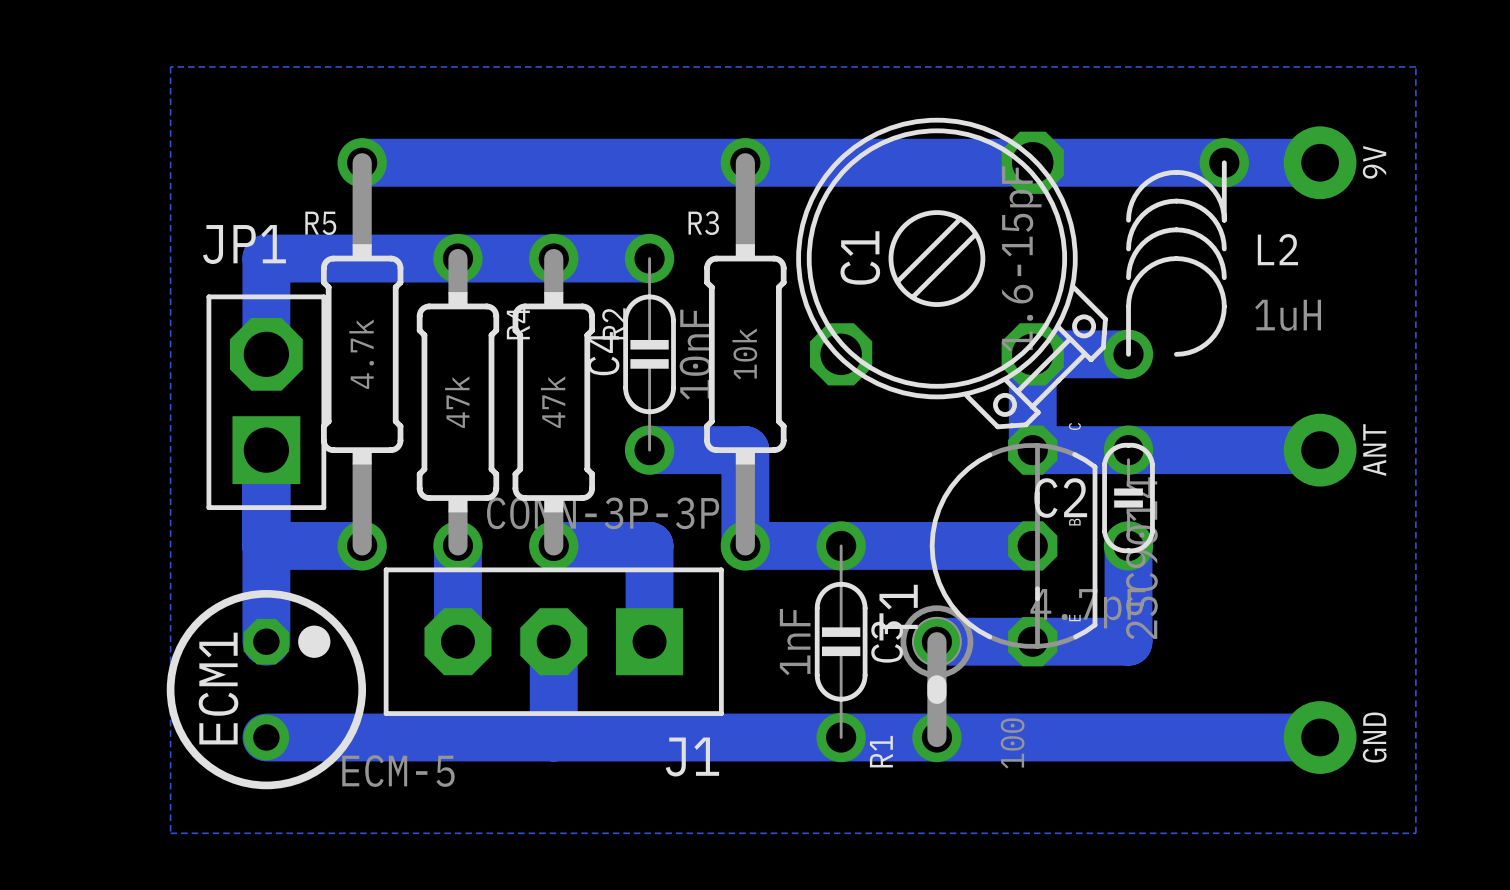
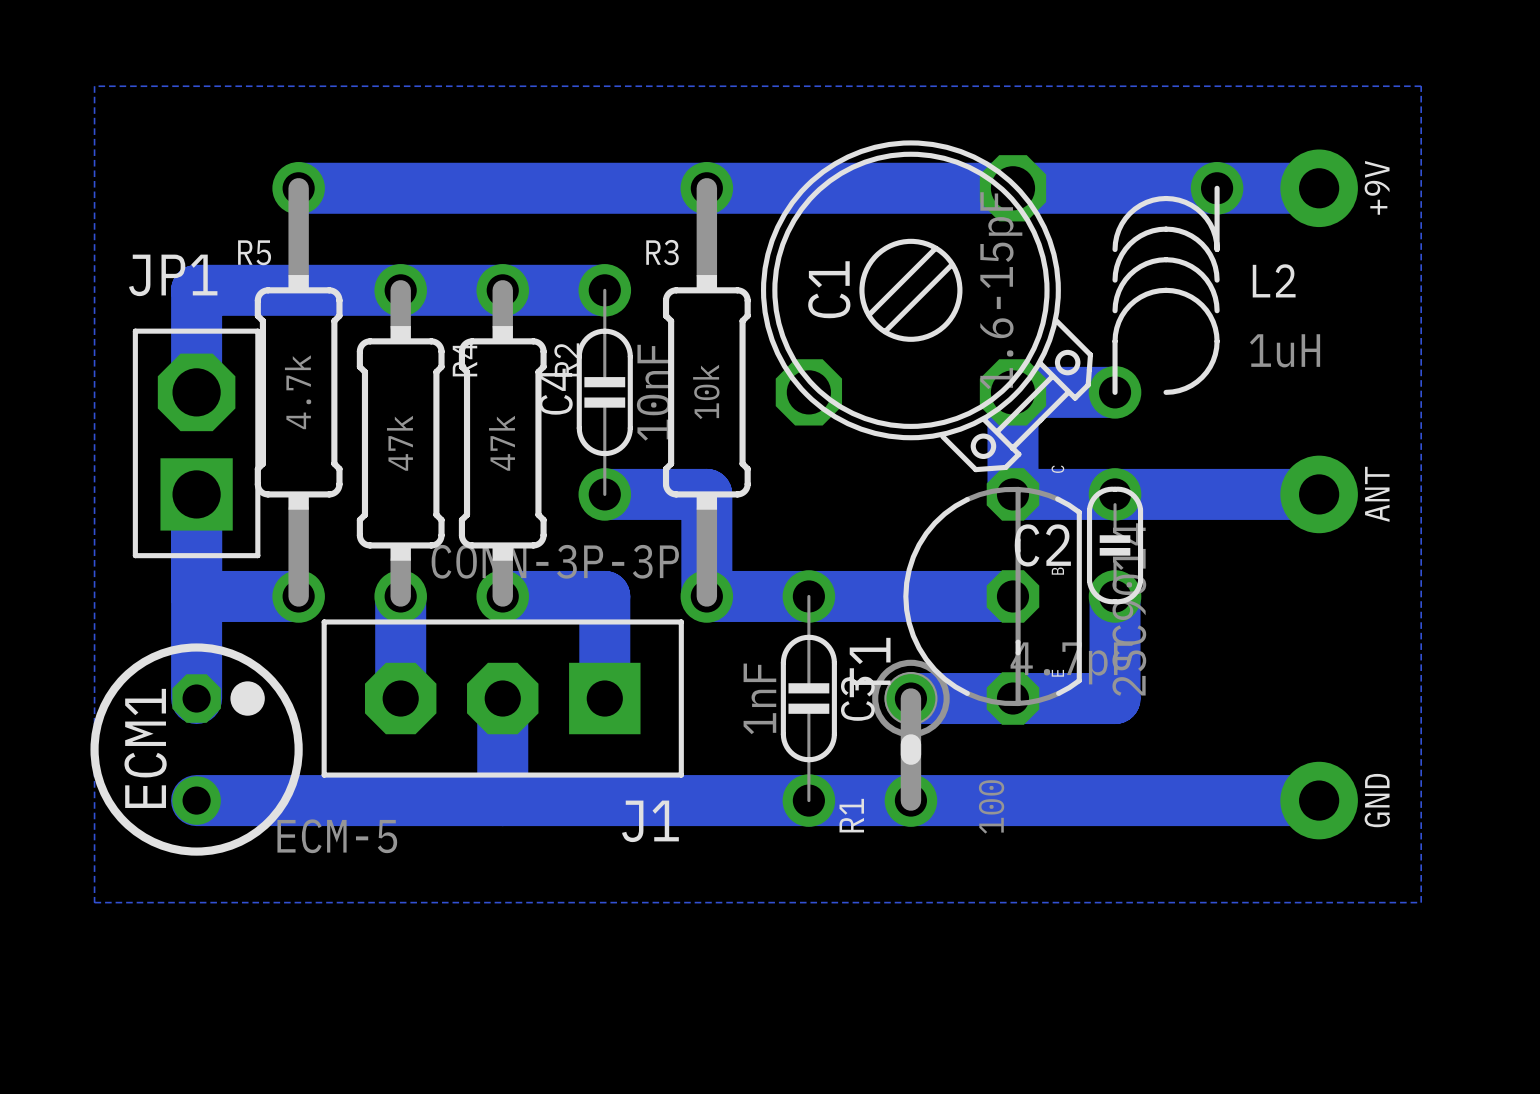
9V name: 9V (1374, 162) -> +9V (1377, 187)

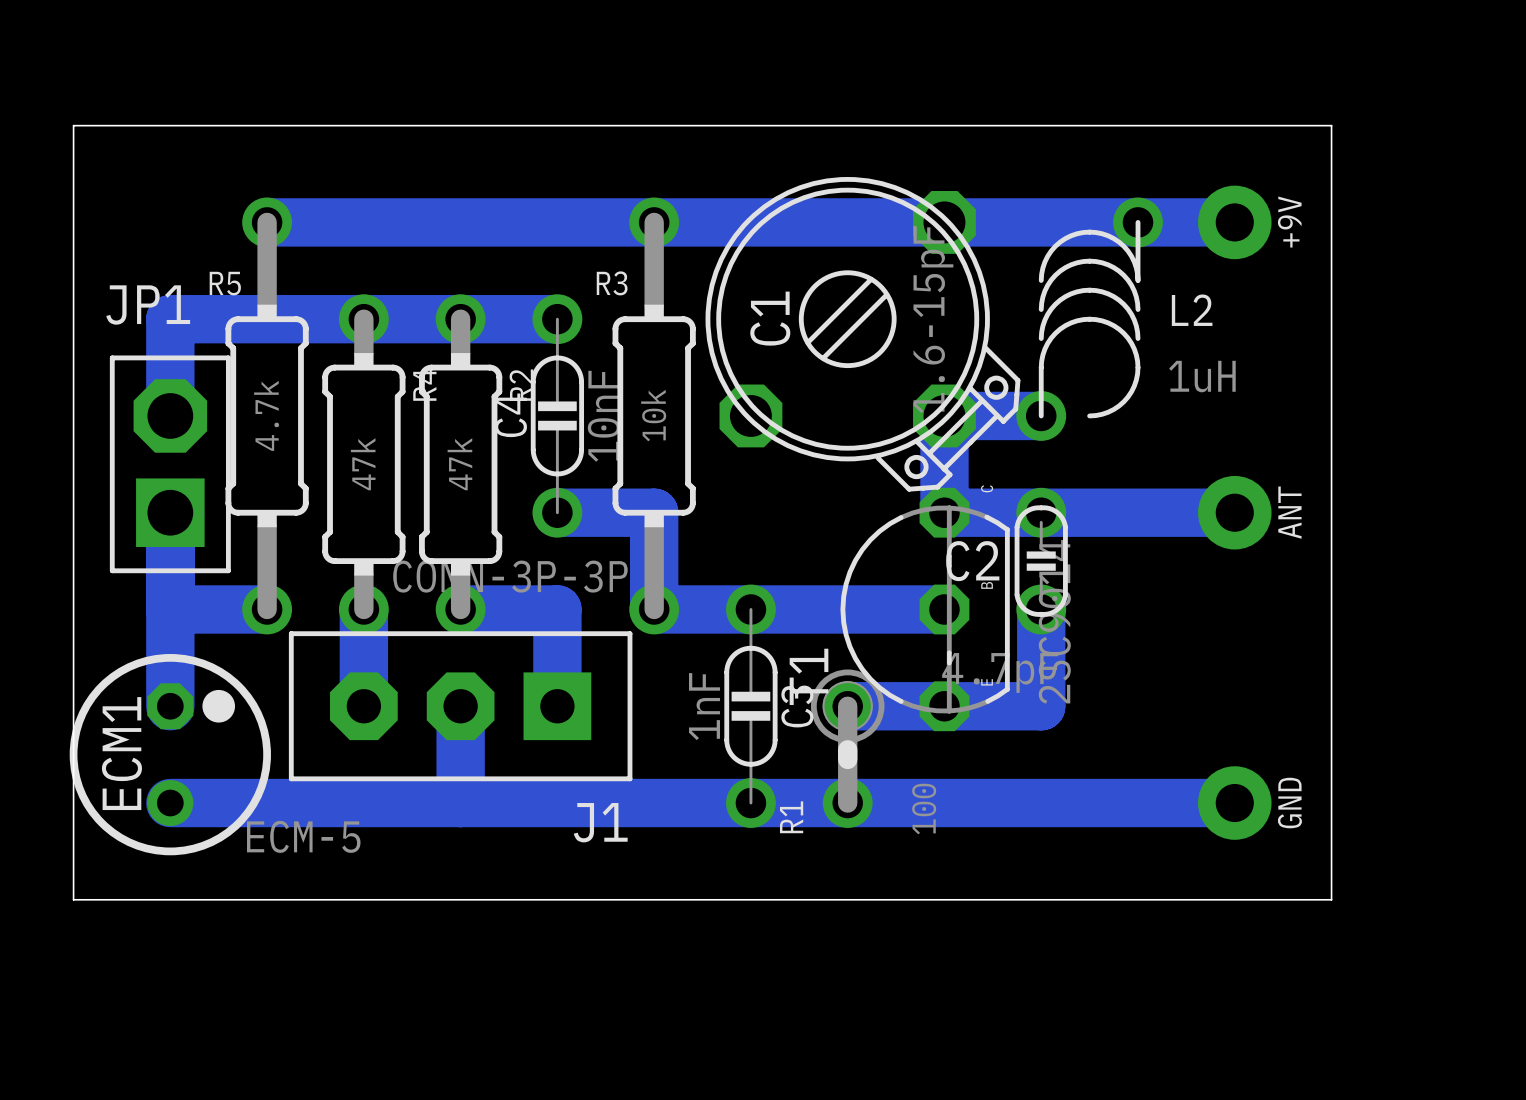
bottom zone outline: (94, 86) (94, 902) (1421, 902) (1421, 86) (94, 86) -> none
board edge: none -> (73, 125) (73, 899) (1331, 899) (1331, 125) (73, 125)

